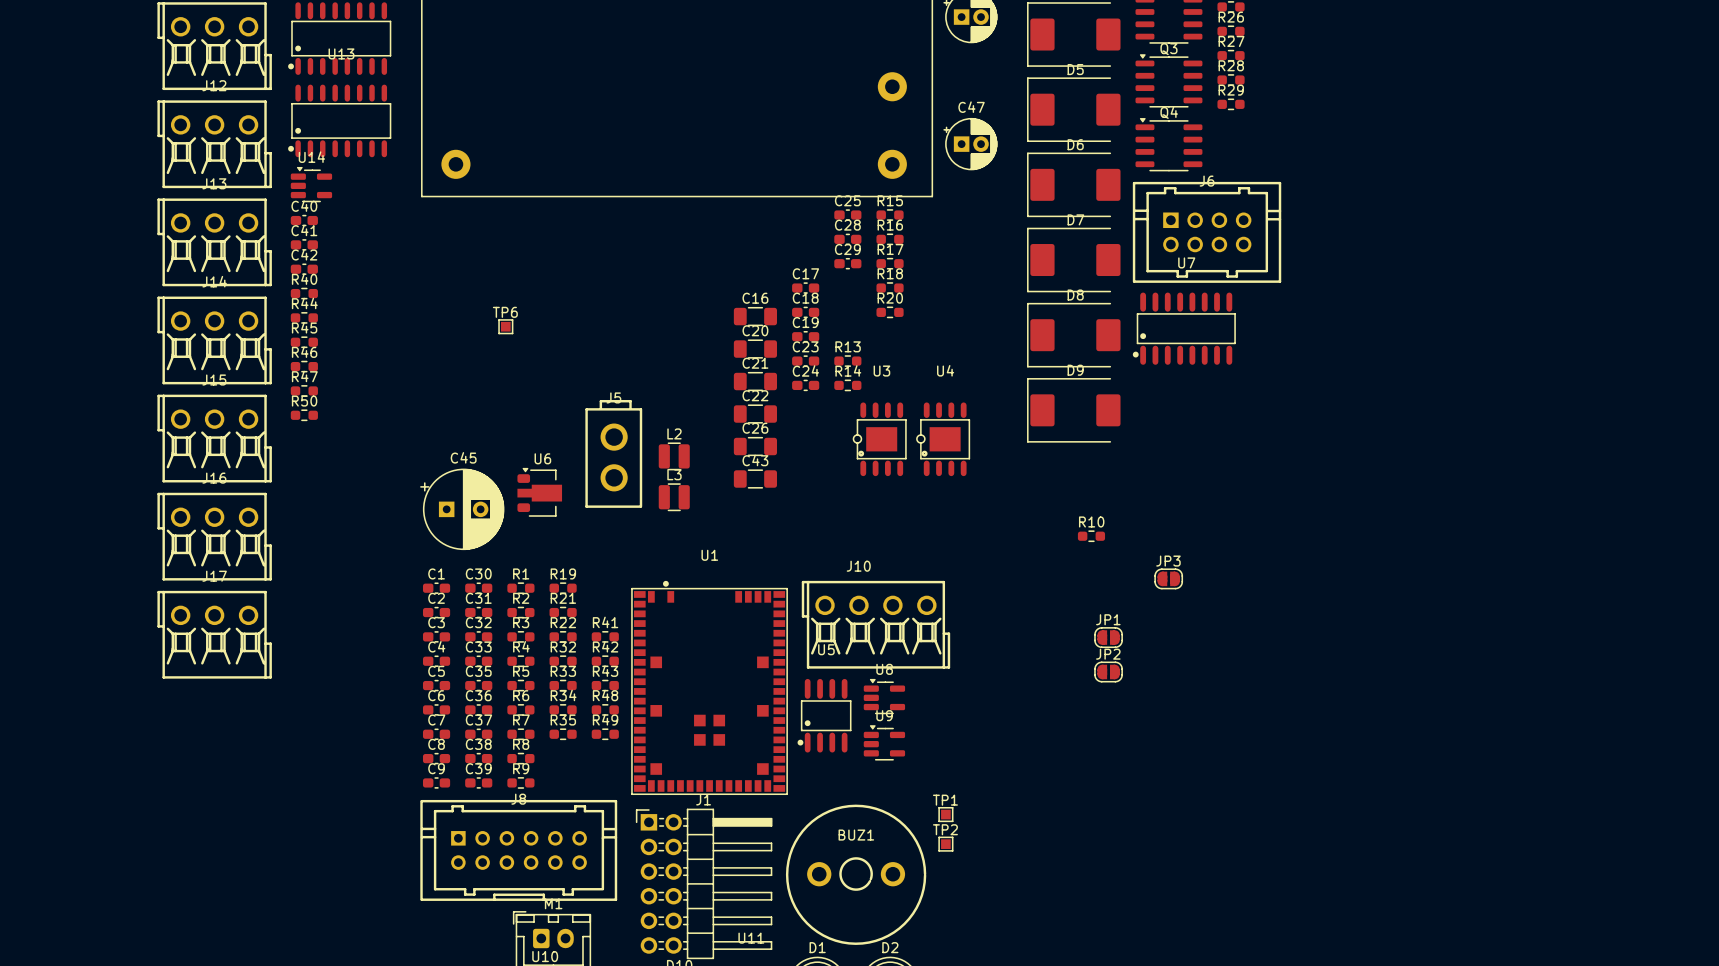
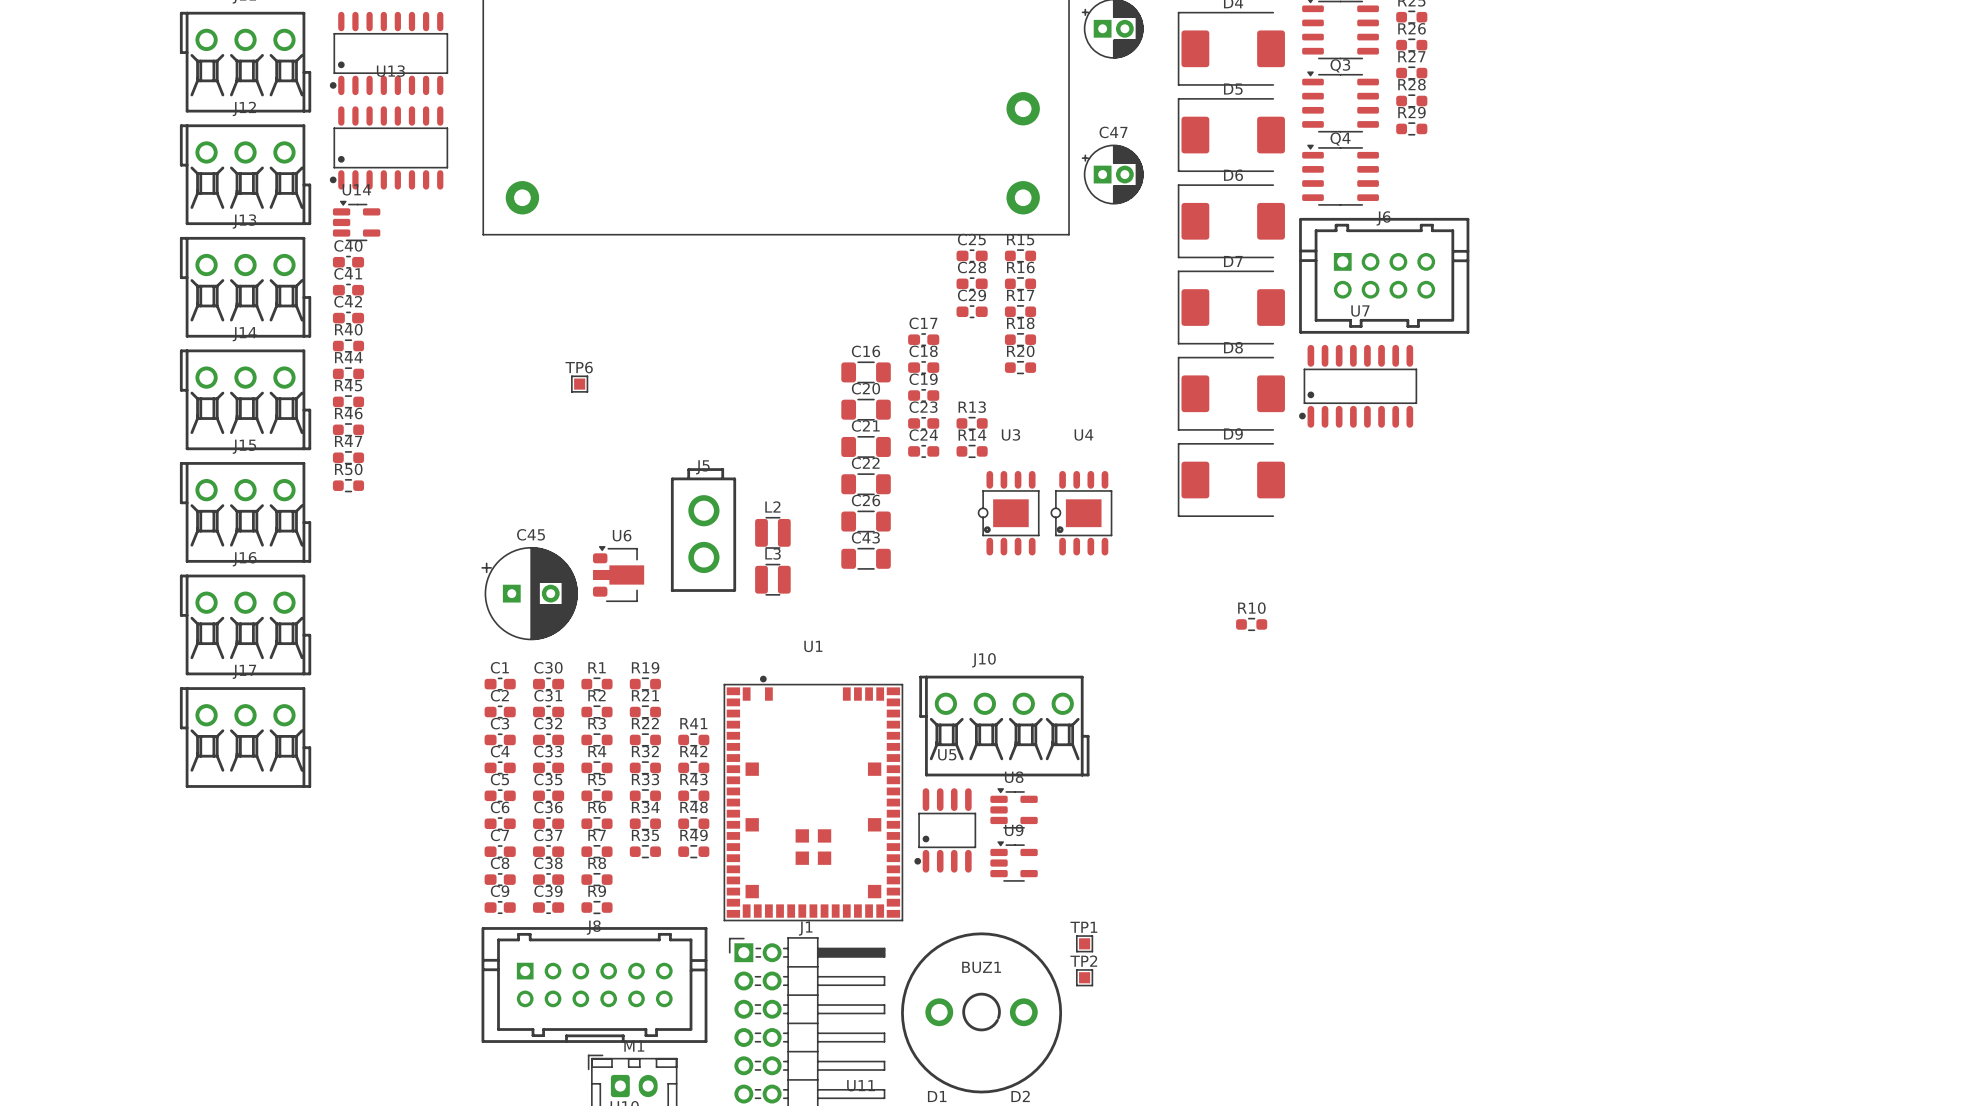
JP3: (1168, 578) -> none
JP1: (1108, 637) -> none
JP2: (1108, 671) -> none

